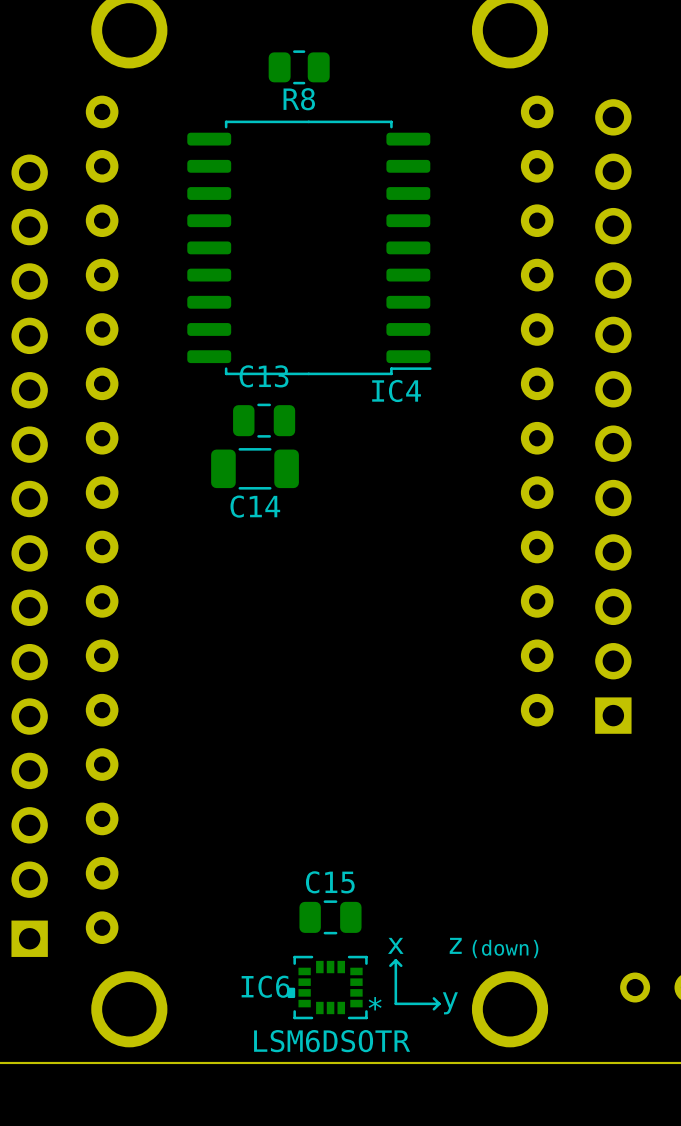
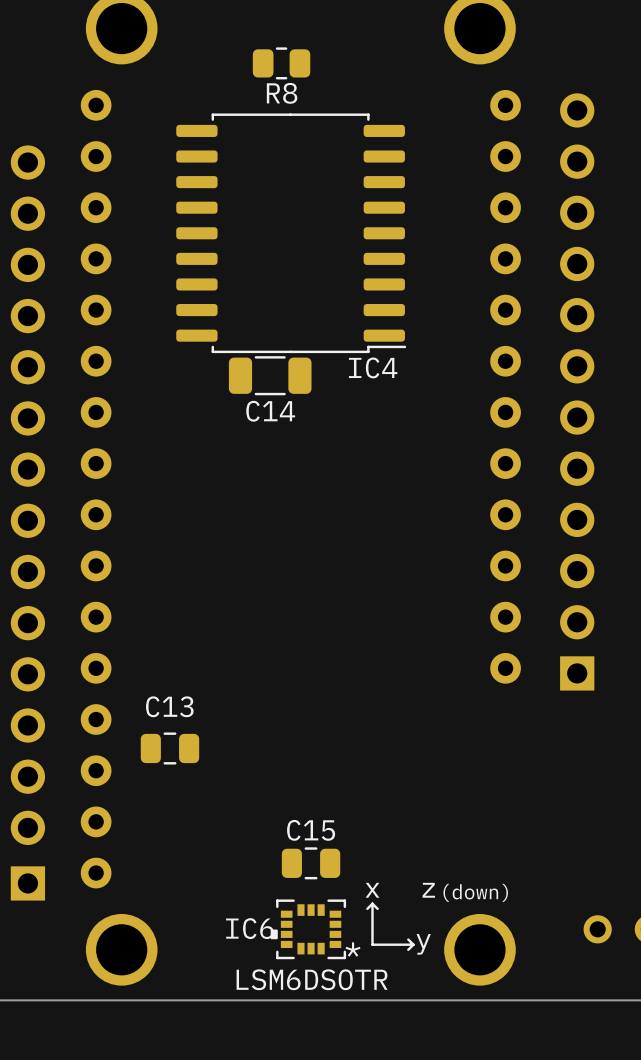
C13 position: (264, 420) -> (169, 748)
C14 position: (255, 468) -> (270, 375)

